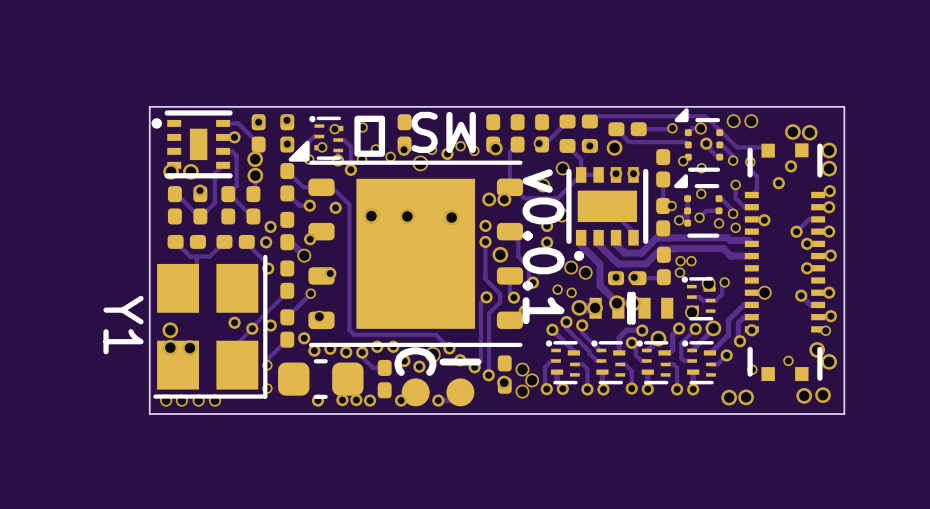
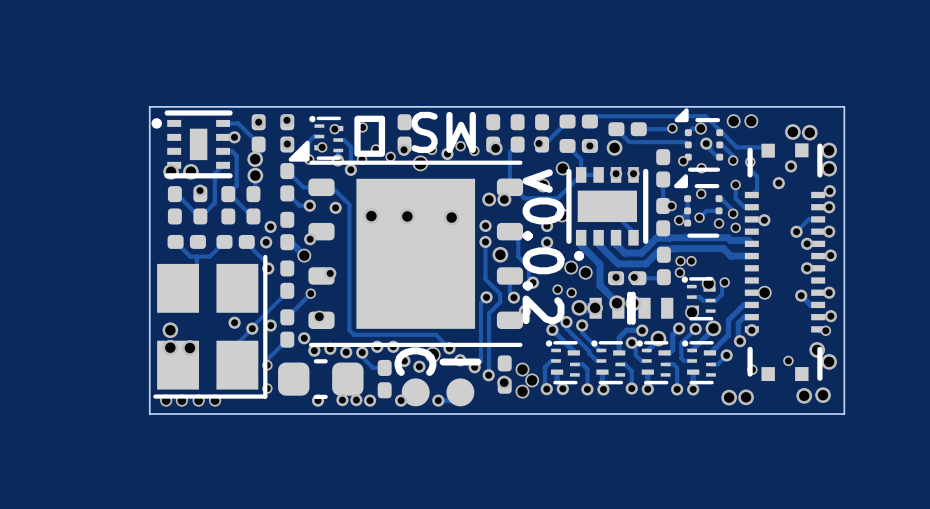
text: v0.0.1 (543, 246) -> v0.0.2 (543, 246)
Y1 name: Y1 (123, 325) -> none

